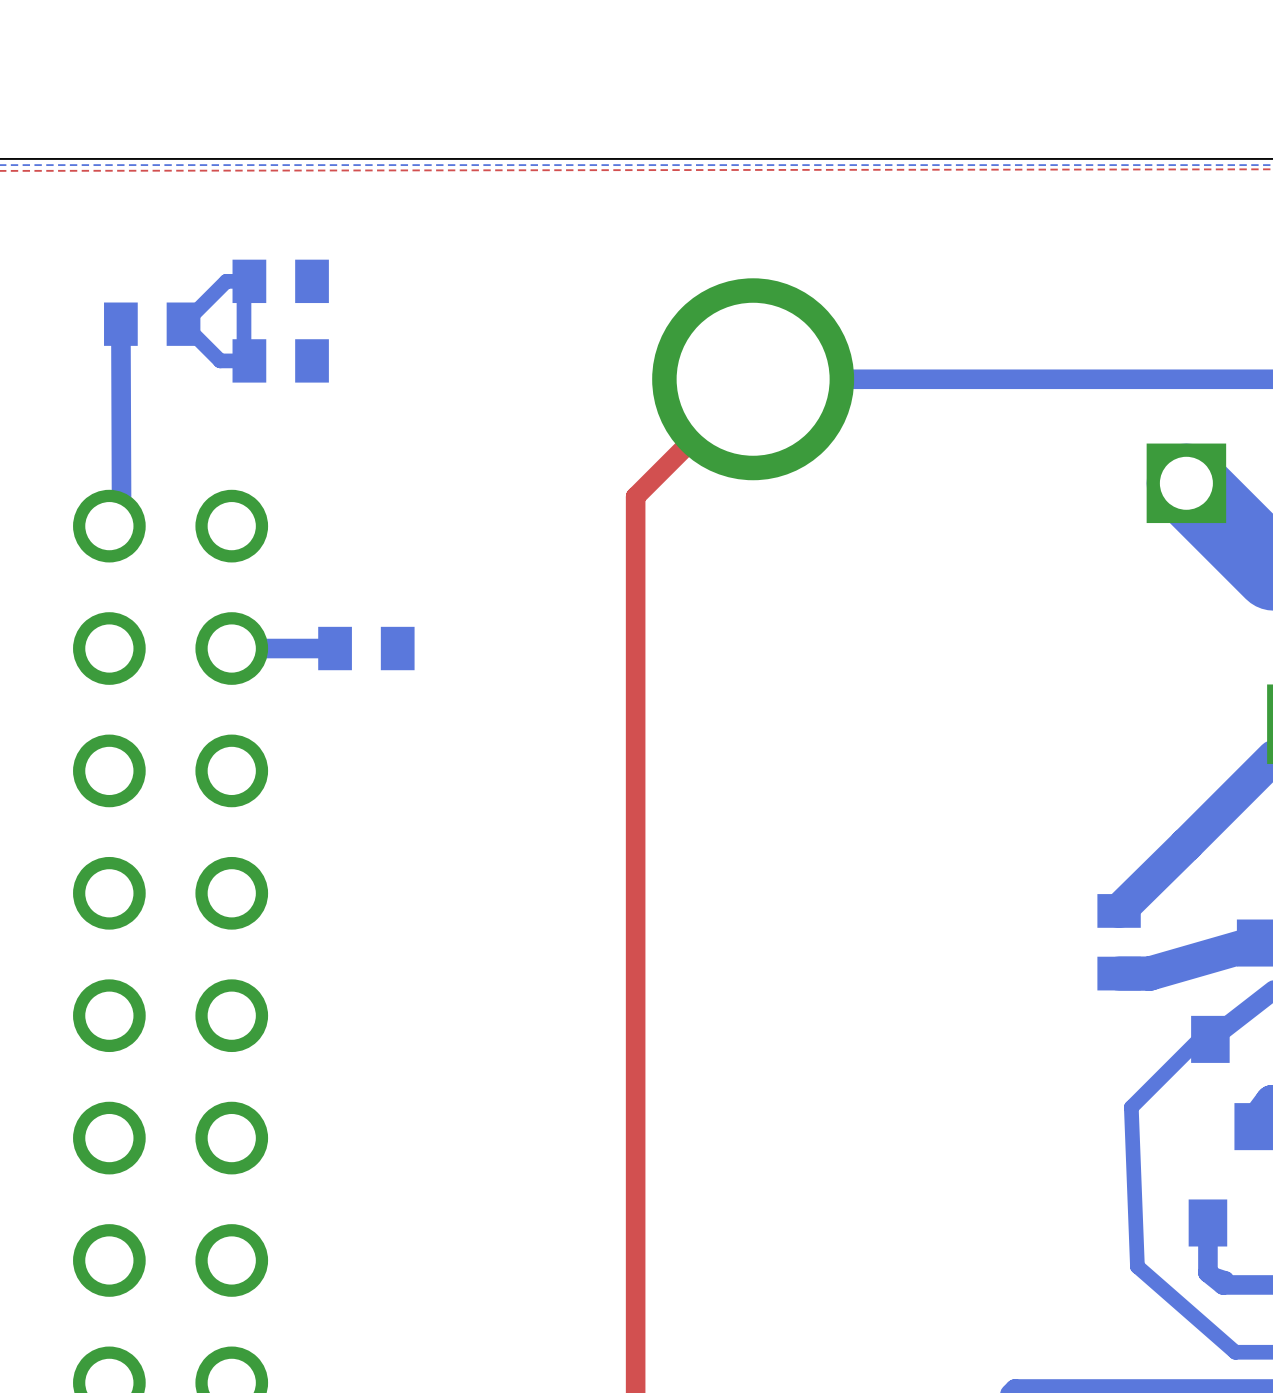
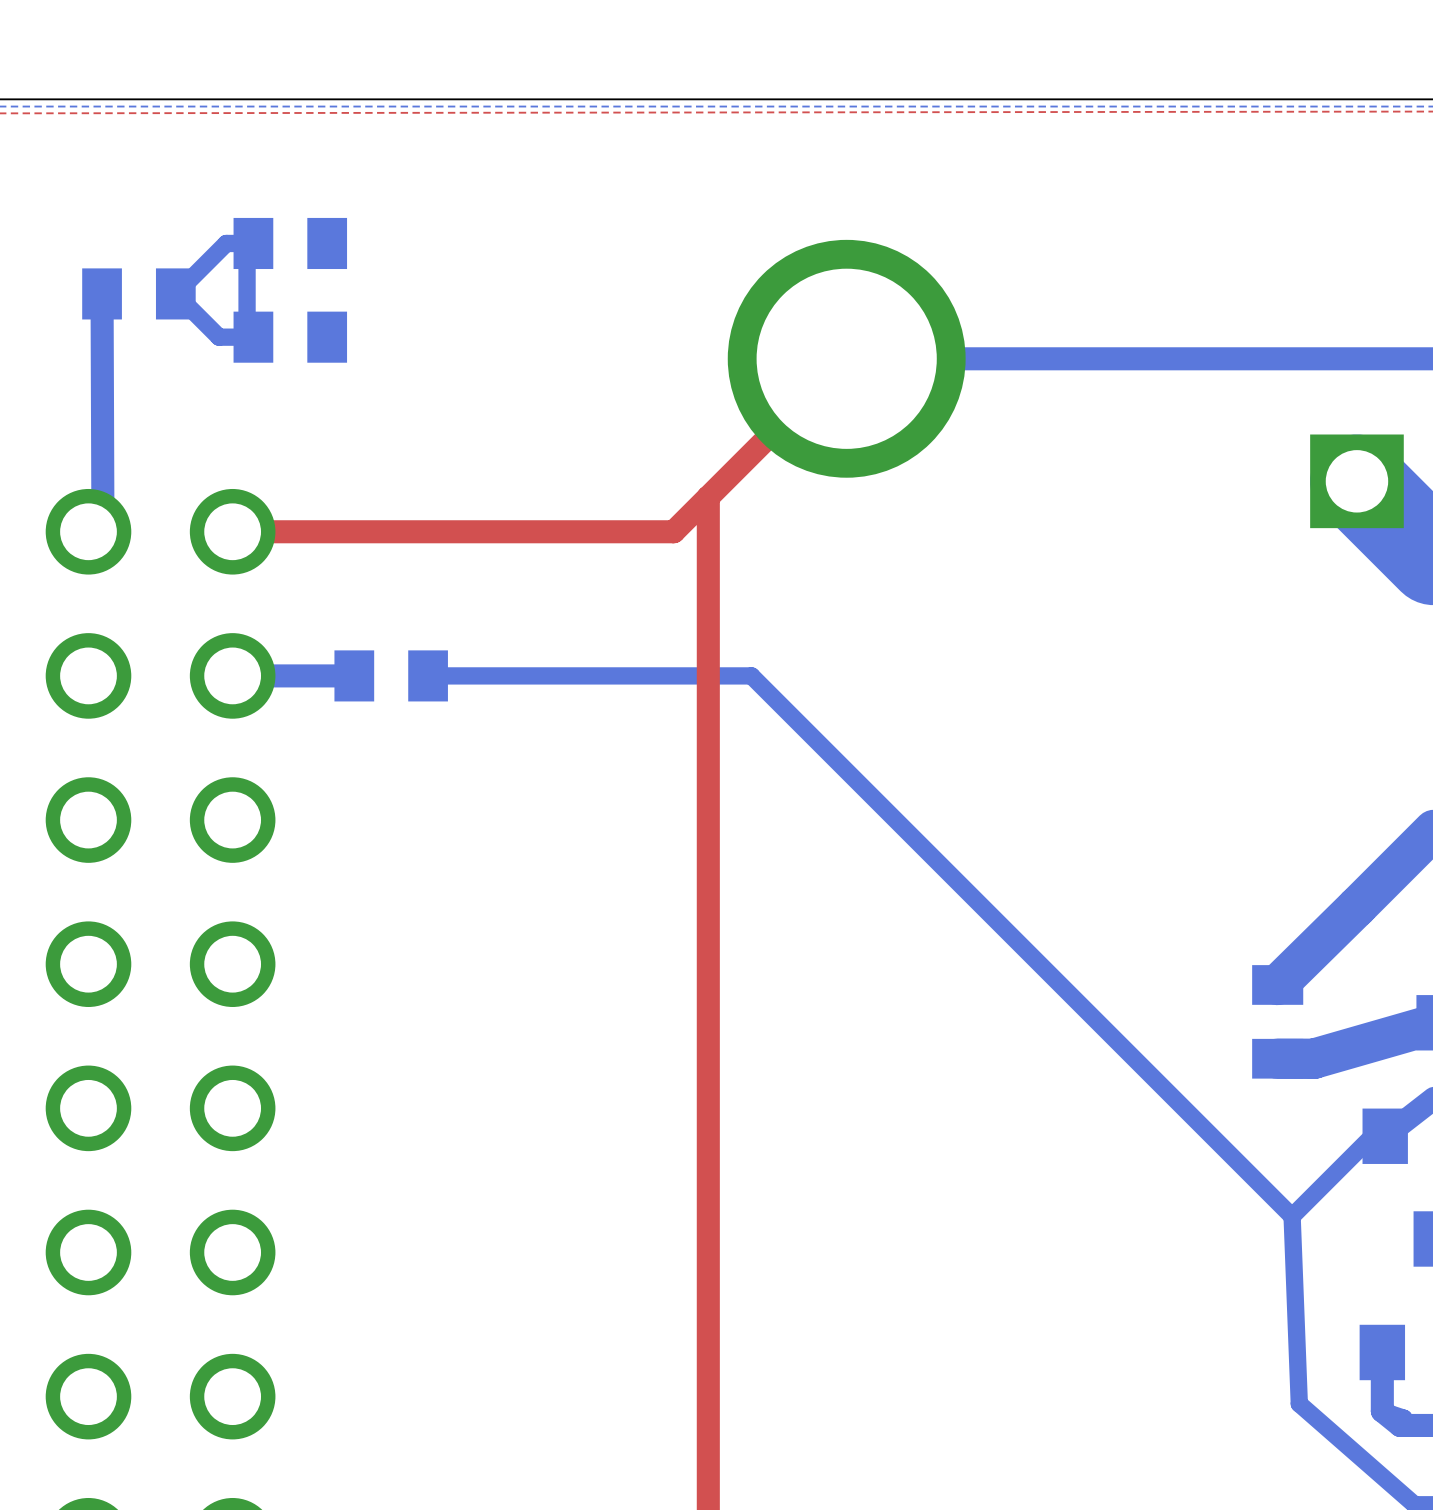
top track: none -> (708, 497) (673, 531) (232, 531)
bottom track: none -> (428, 675) (751, 675) (1292, 1216)

